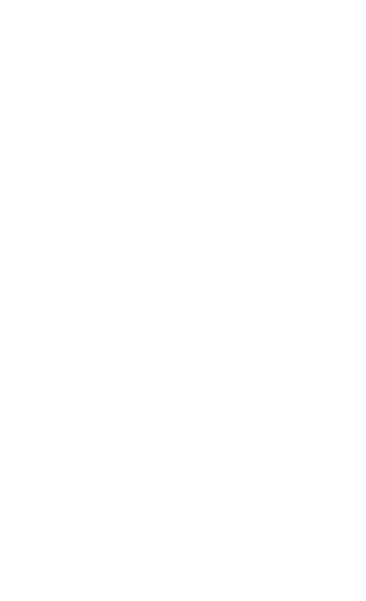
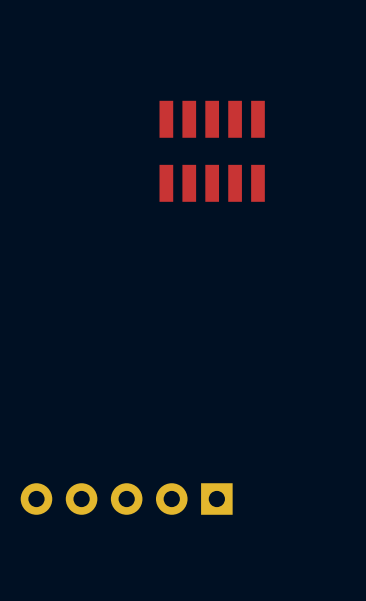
part: none -> (212, 151)
part: none -> (126, 499)

